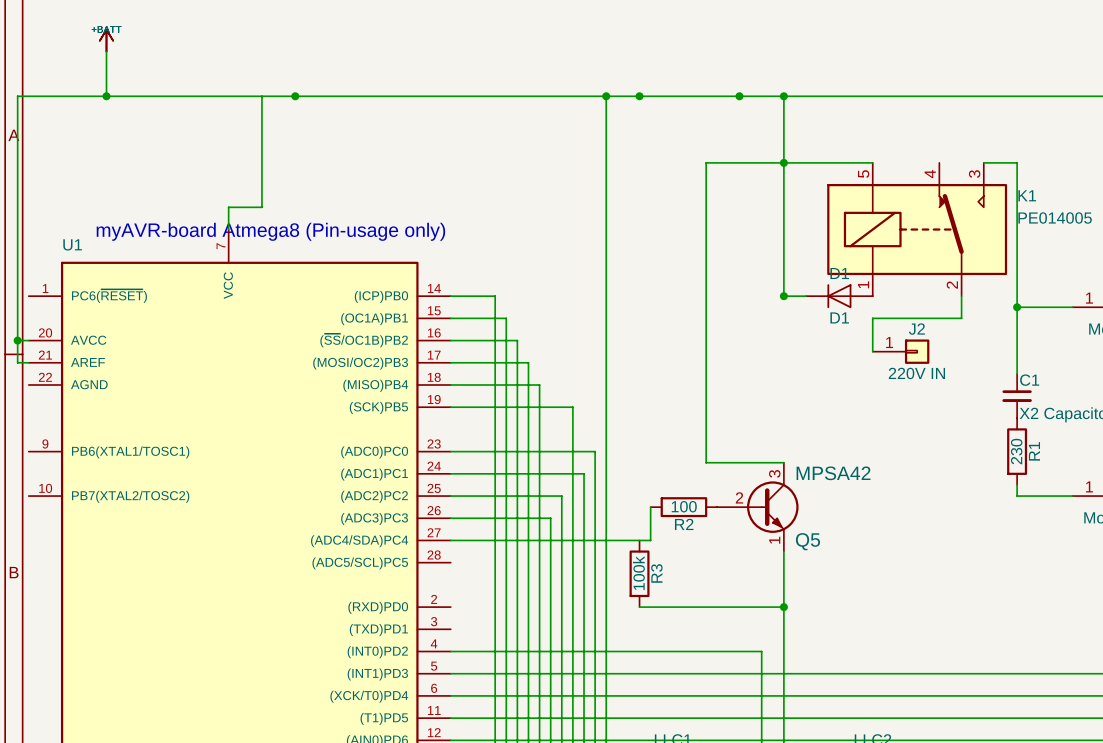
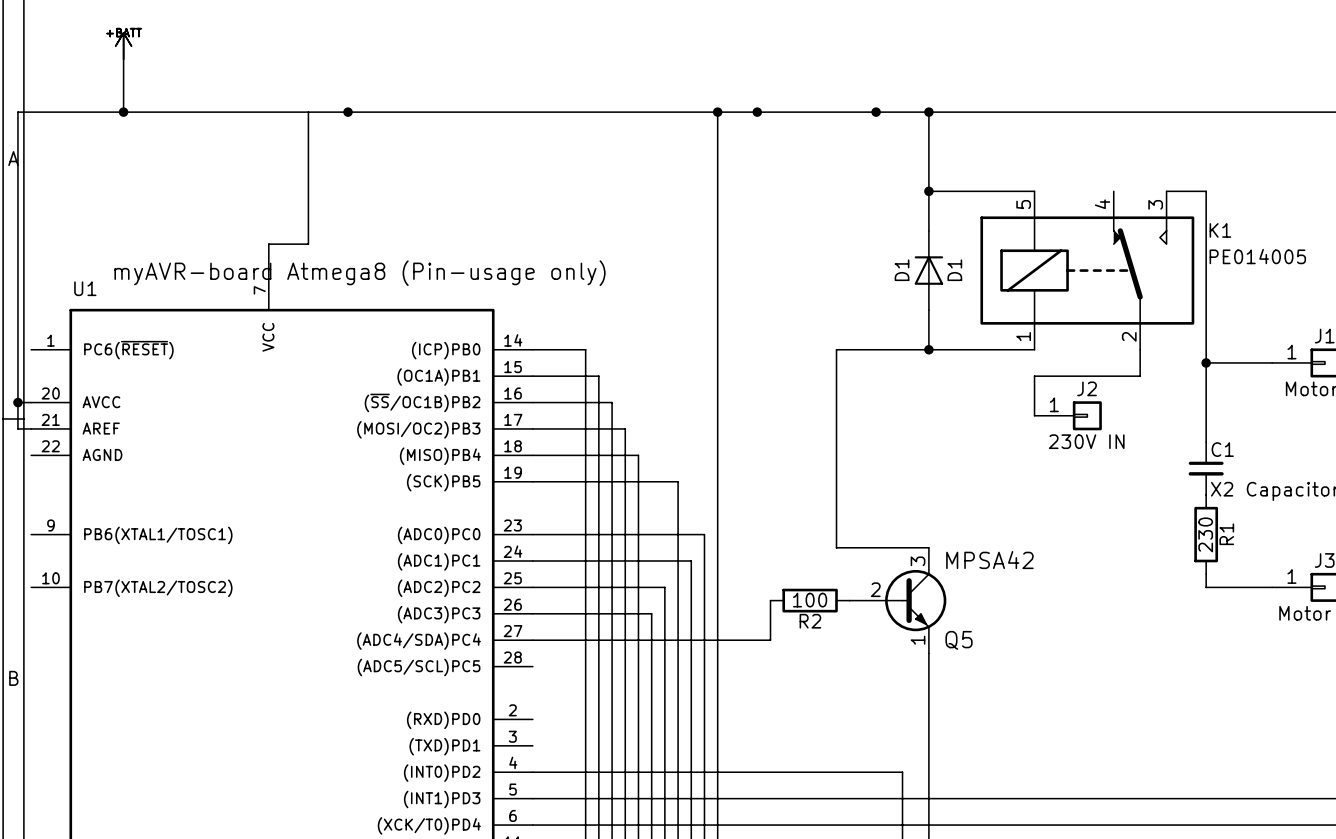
wire: (783, 162) (706, 162) (706, 296) -> (928, 349) (836, 349)
D1 rotation: 0° (839, 296) -> 90° clockwise (928, 270)
D1 position: (839, 296) -> (928, 270)
J2 value: 220V IN (916, 373) -> 230V IN (1086, 441)
R3: 100k (639, 573) -> none
wire: (639, 607) (783, 607) -> none
junction: (783, 607) -> none

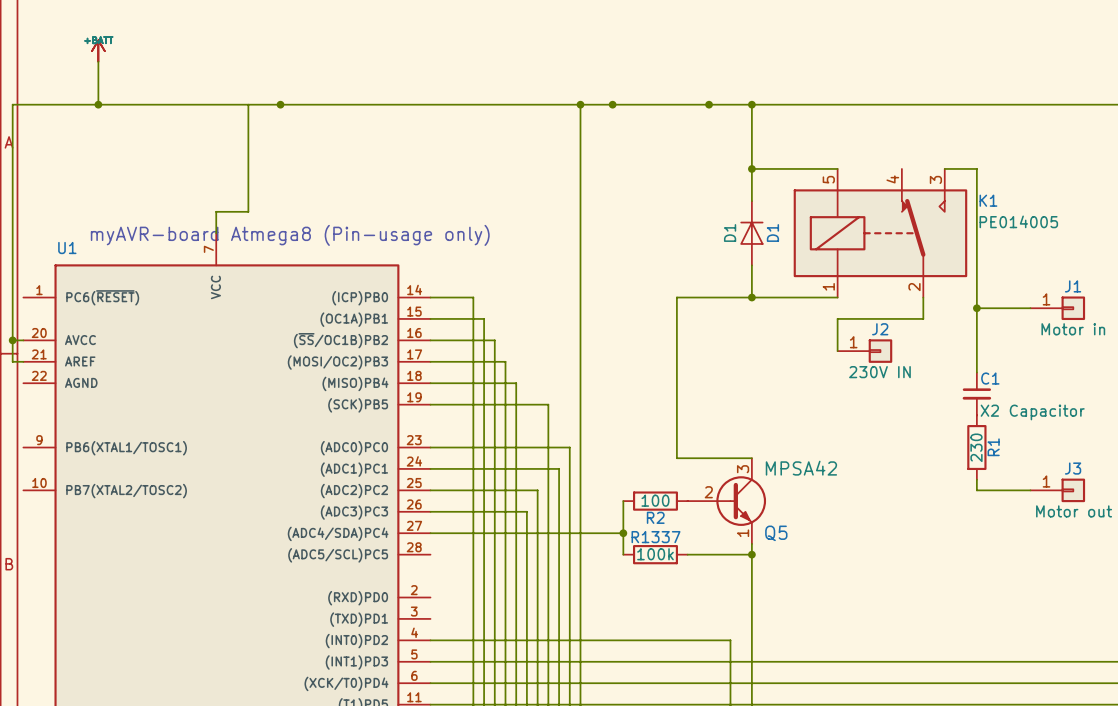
wire: none -> (623, 533) (623, 554)
junction: none -> (623, 533)
R1337: none -> 100k (655, 554)
wire: none -> (687, 554) (751, 554)
junction: none -> (751, 554)

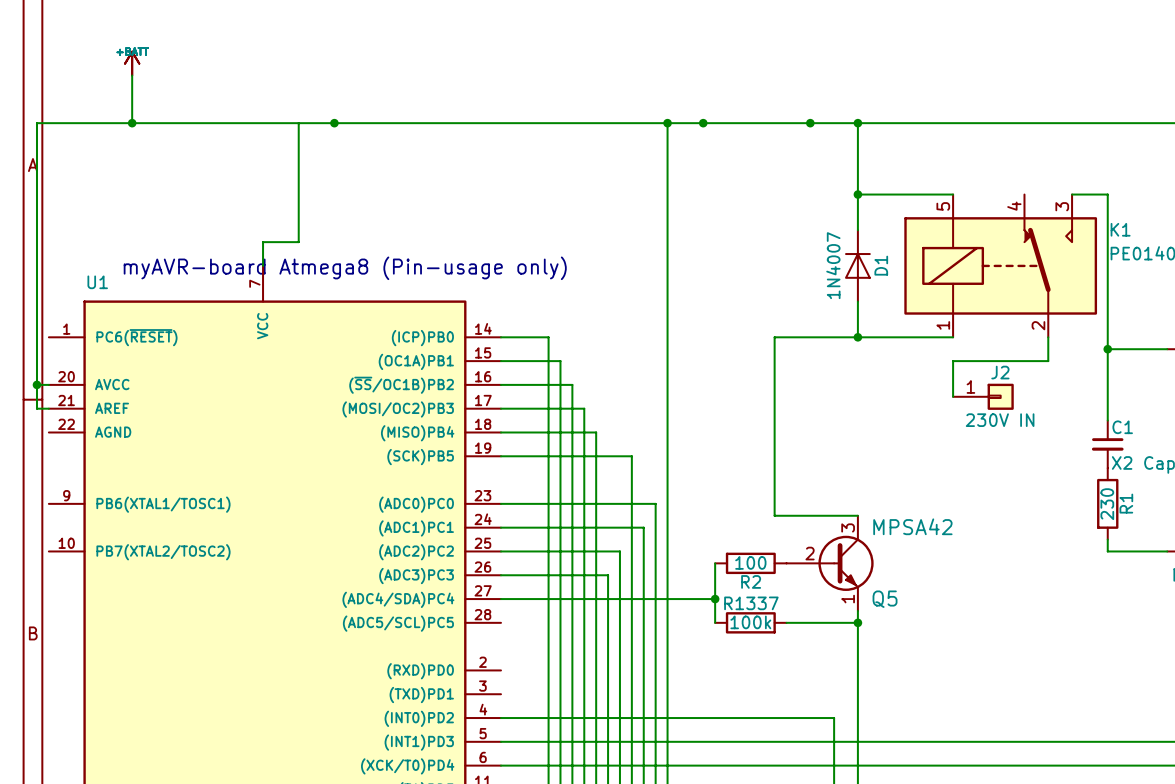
D1 value: D1 (730, 232) -> 1N4007 (833, 265)

